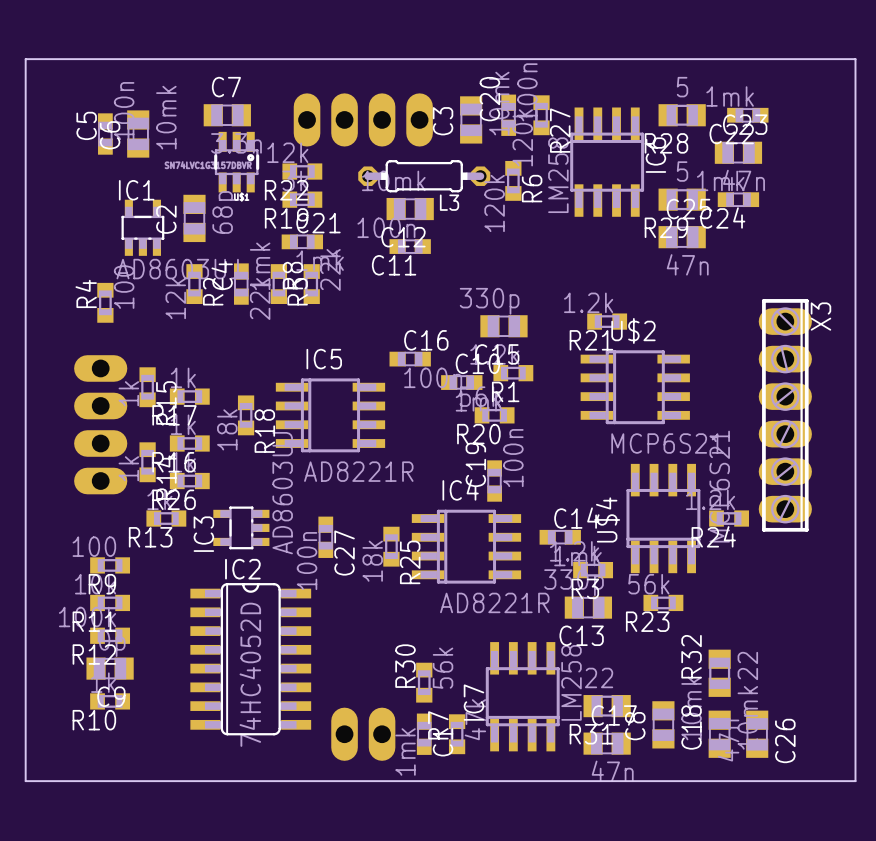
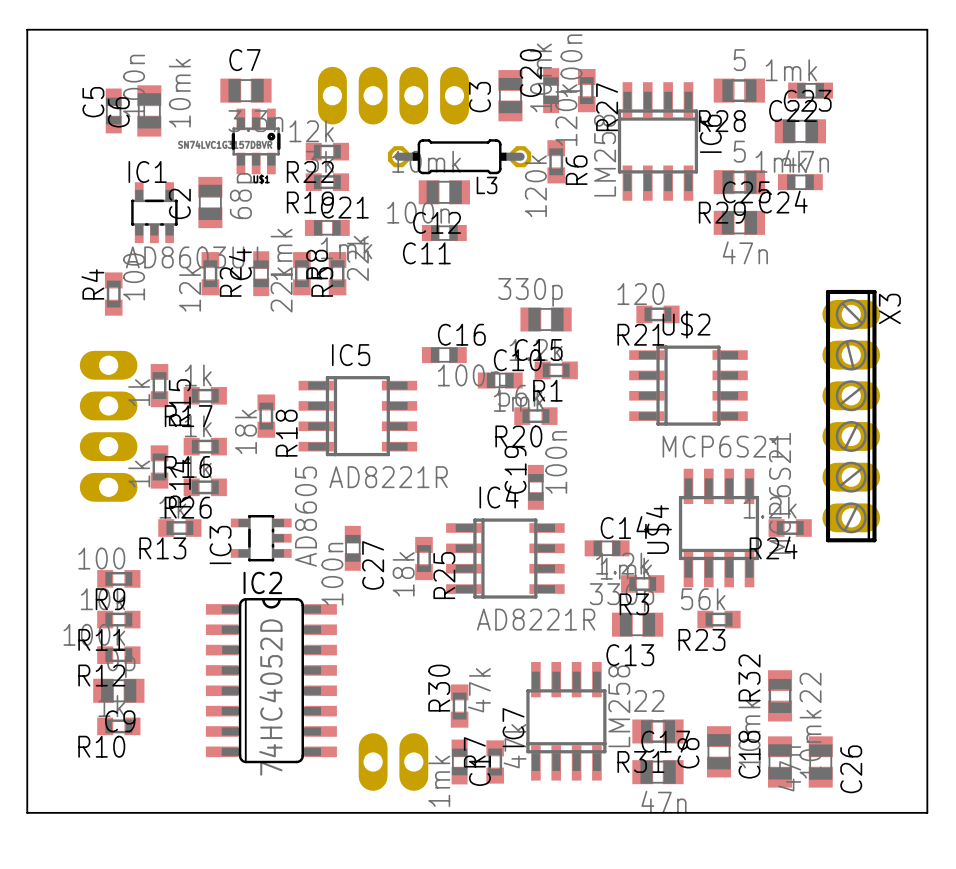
R21 value: 1.2k (588, 302) -> 120 (640, 294)
IC3 value: AD8603UJ (282, 493) -> AD8605 (305, 516)
R30 value: 56k (443, 668) -> 47k (479, 690)

